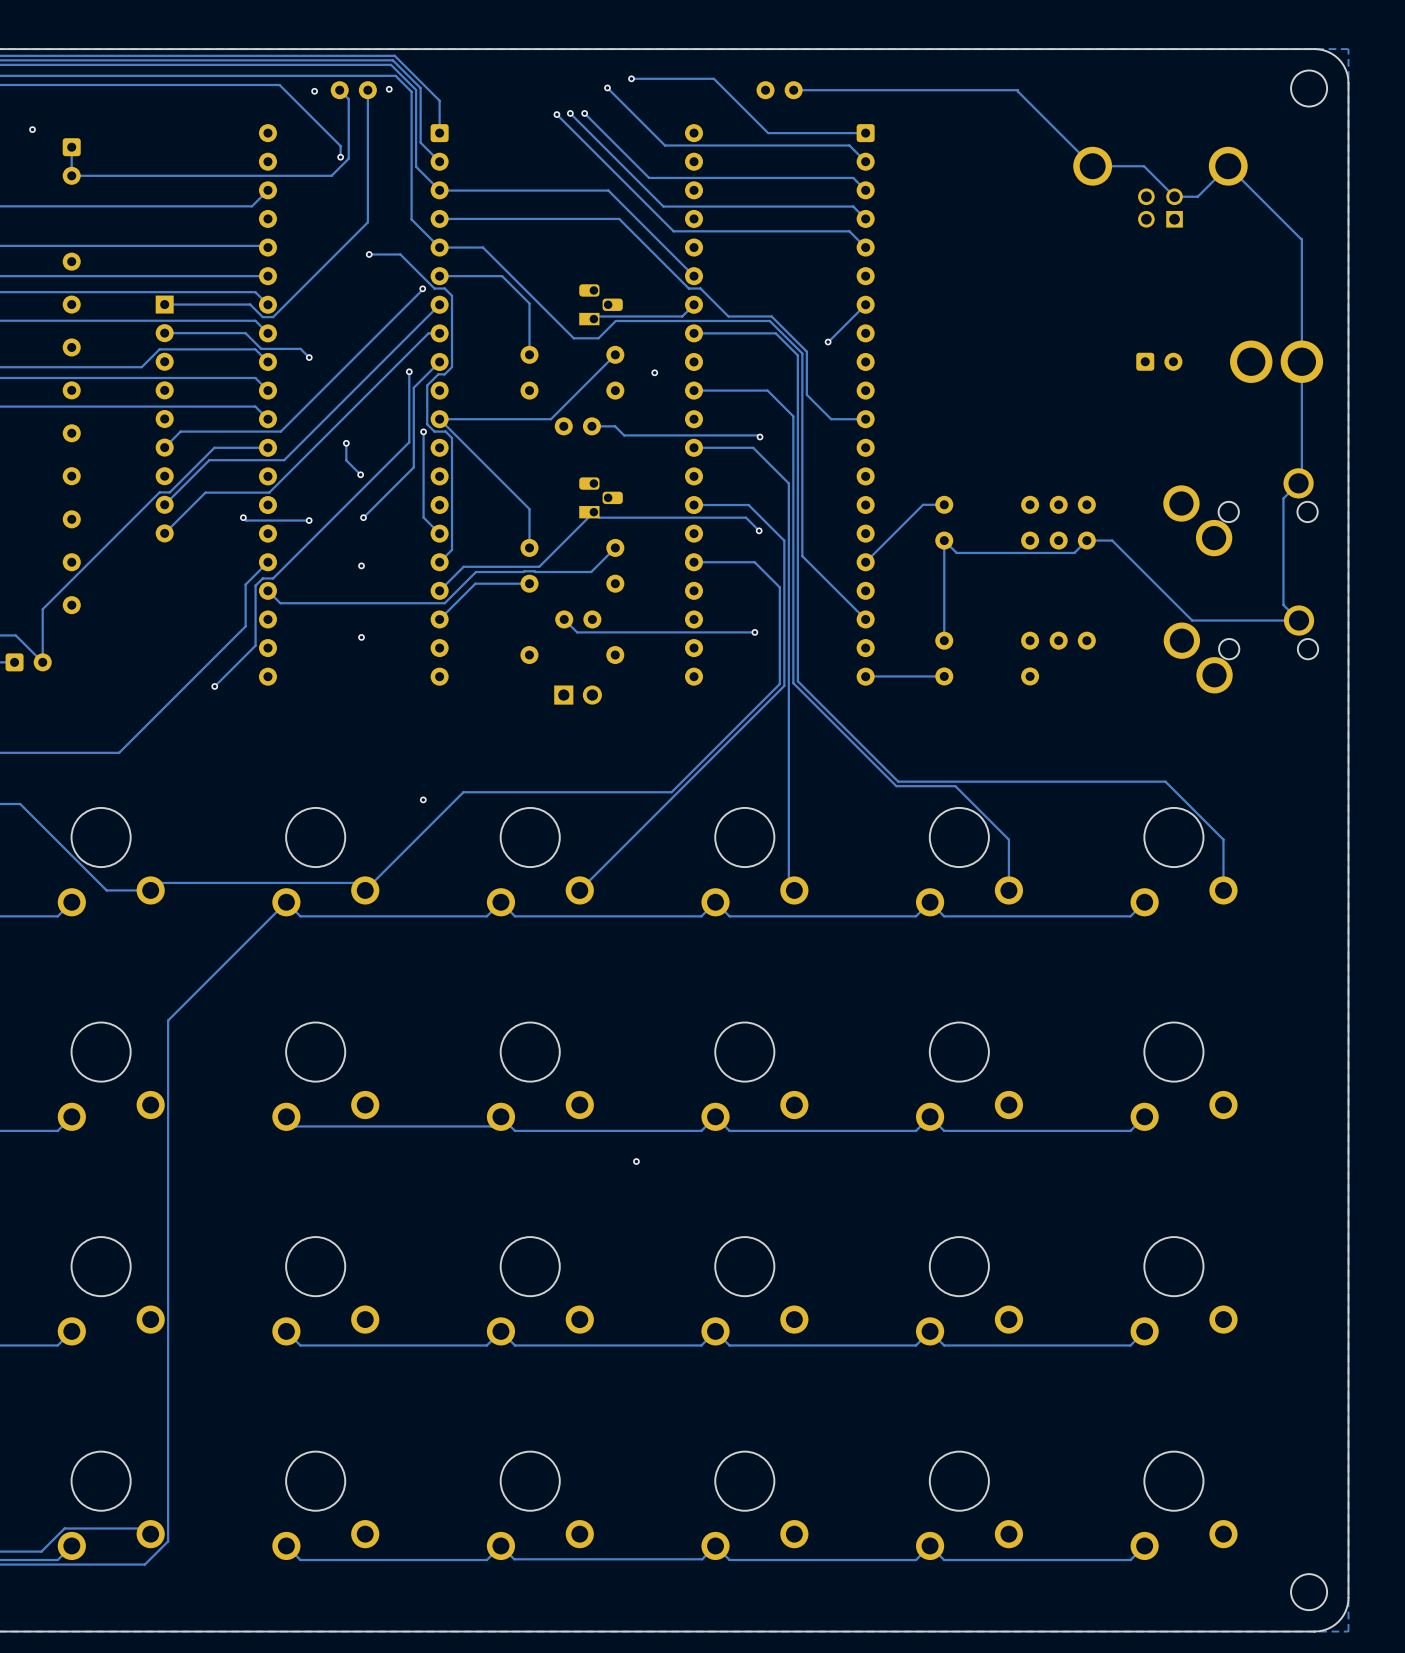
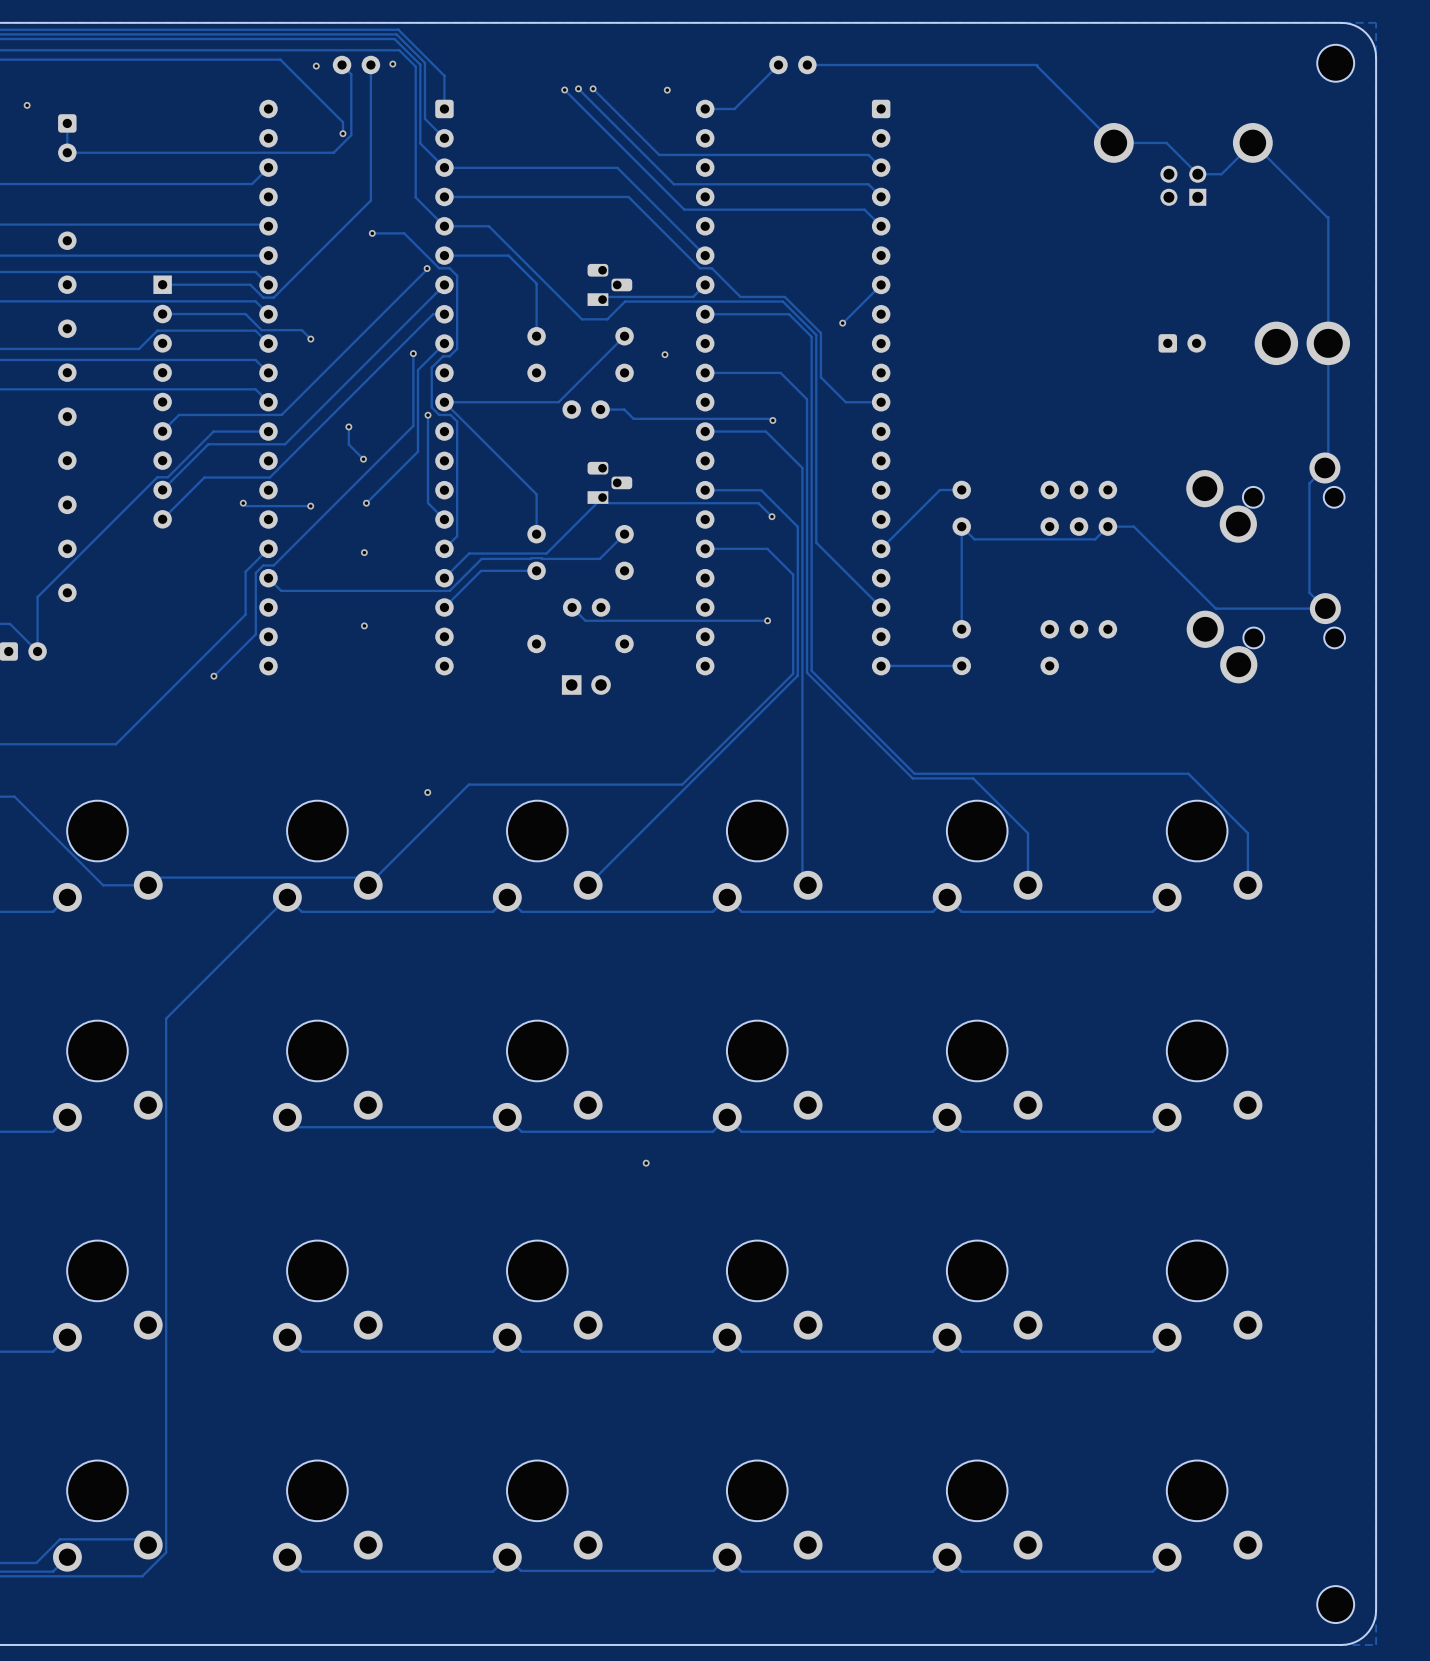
track: (631, 78) (713, 78) (768, 133) (865, 133) -> none
via: (631, 78) -> none
track: (607, 87) (665, 145) (849, 145) (865, 161) -> none
via: (607, 87) -> none
track: none -> (778, 65) (734, 108) (705, 108)
via: none -> (667, 90)

